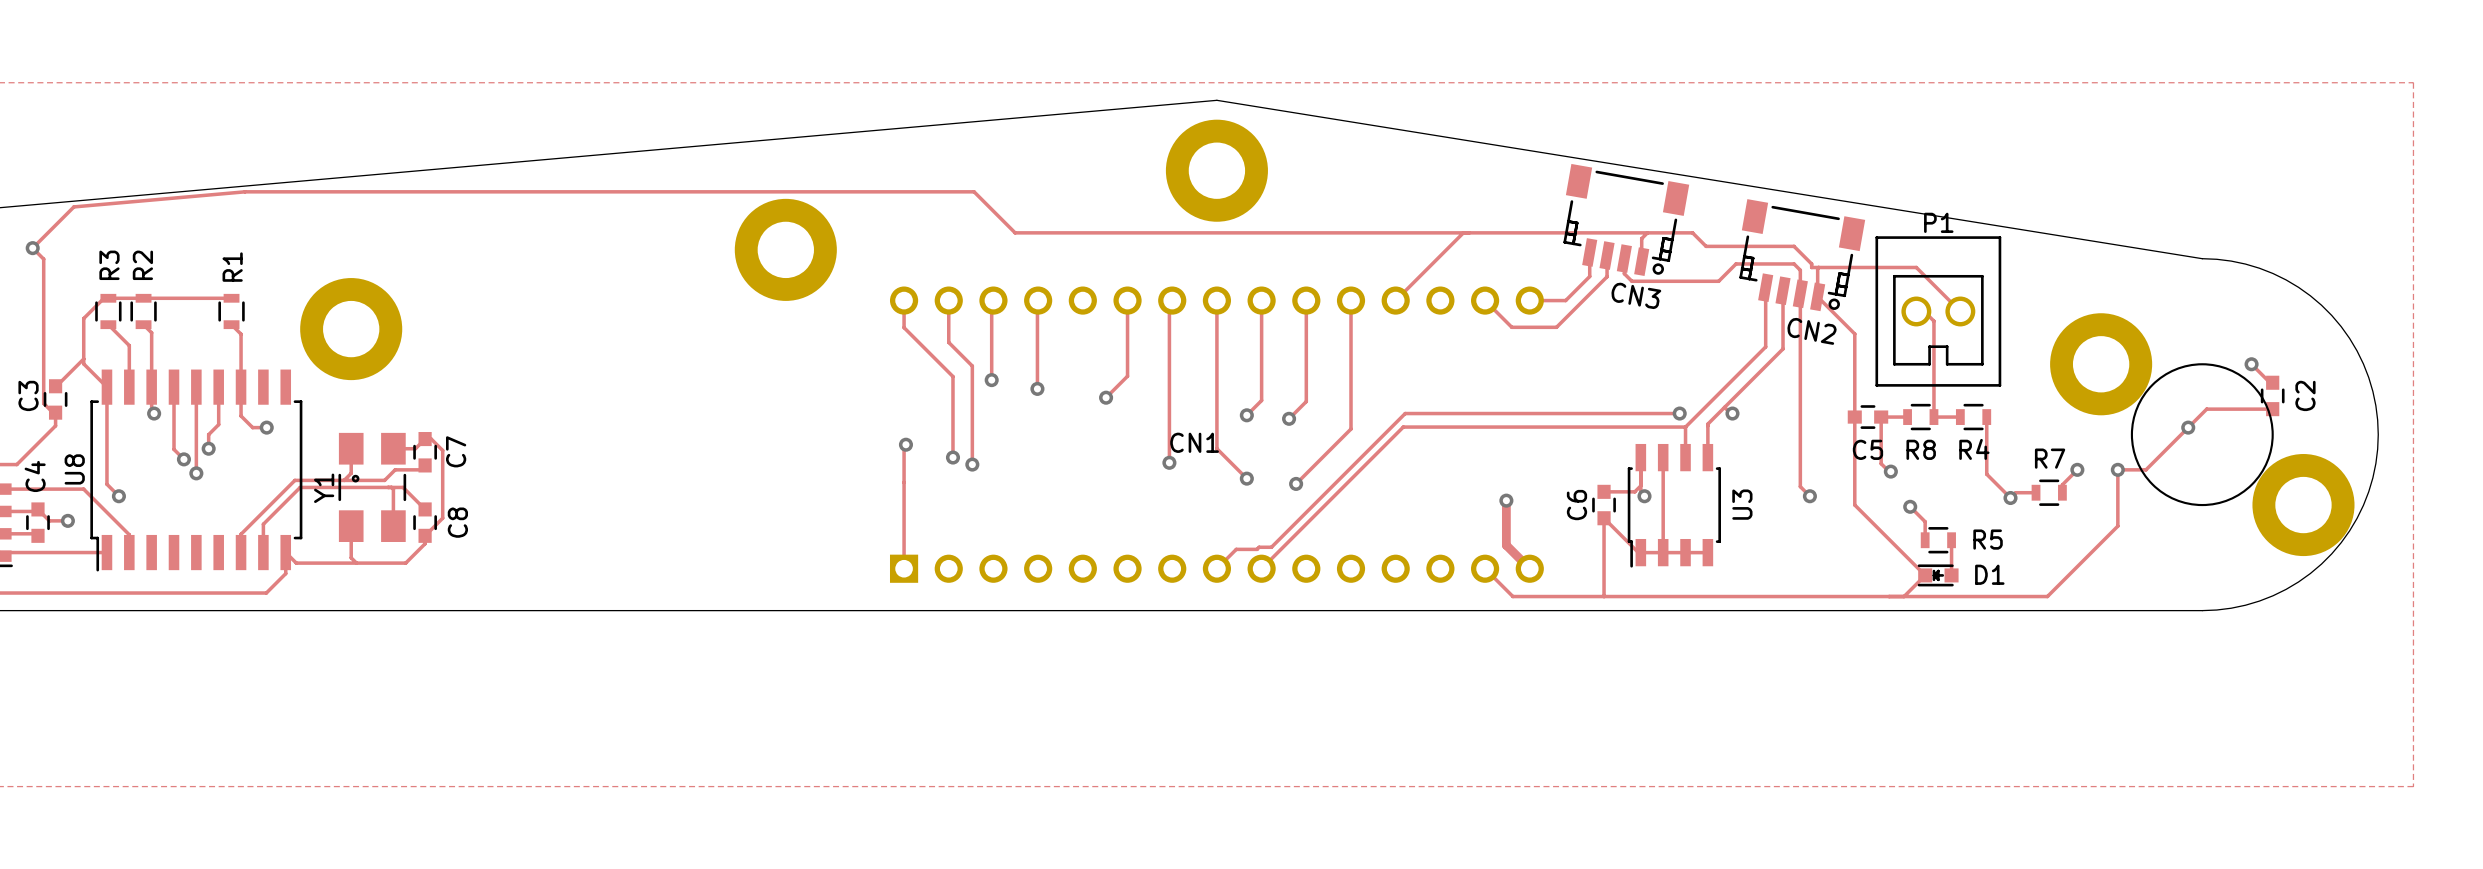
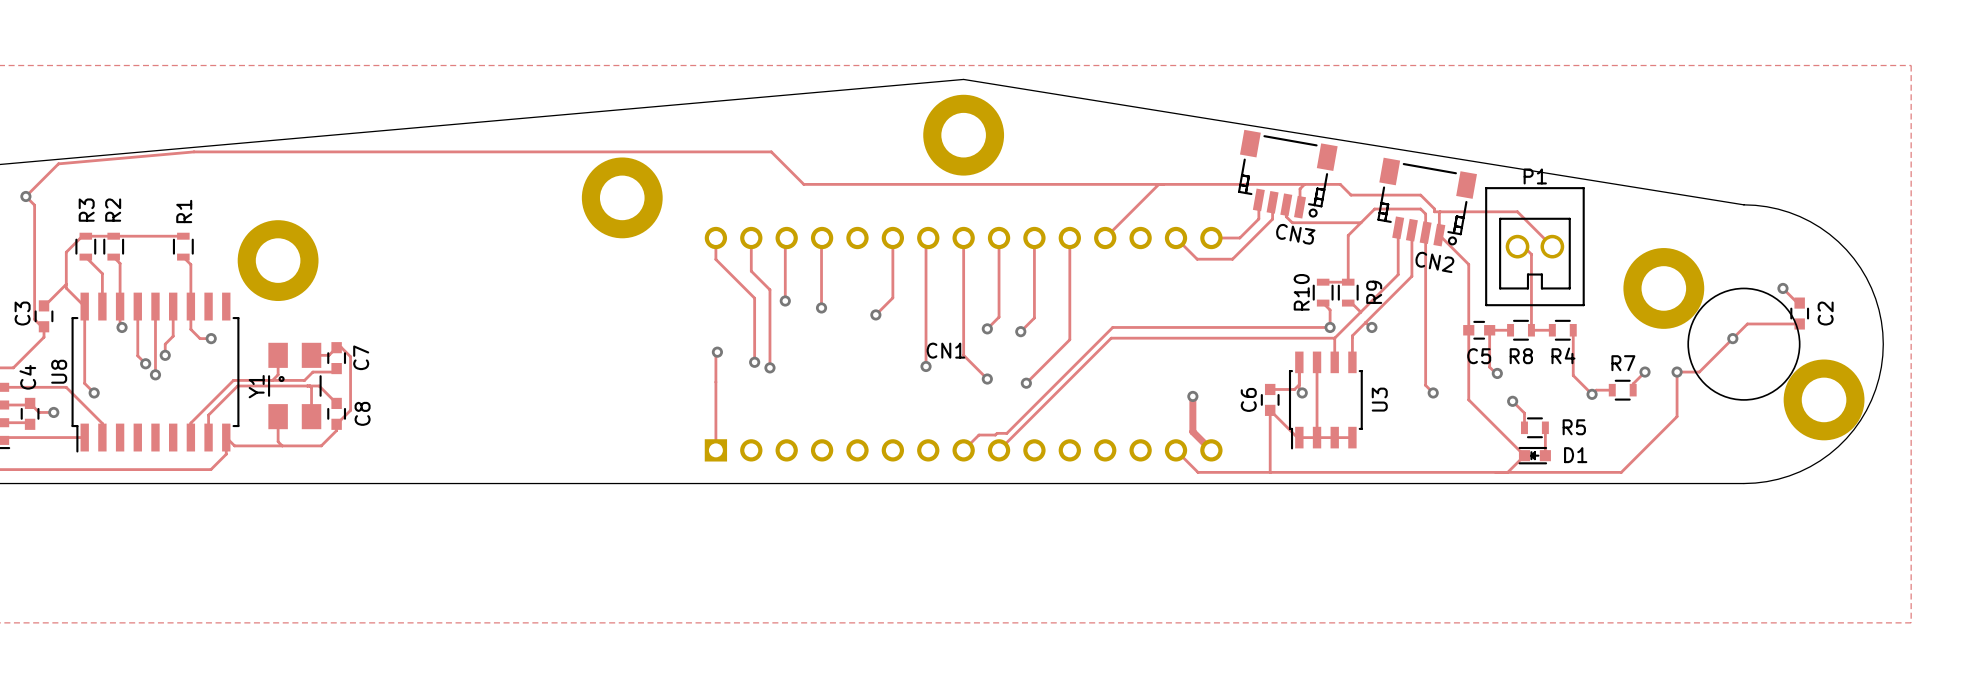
track: none -> (1360, 222) (1348, 235) (1348, 282) (1323, 282)
R10: none -> (1323, 292)
R9: none -> (1348, 292)
track: none -> (1323, 303) (1330, 310) (1330, 327)
track: none -> (1348, 303) (1351, 303) (1360, 312)

